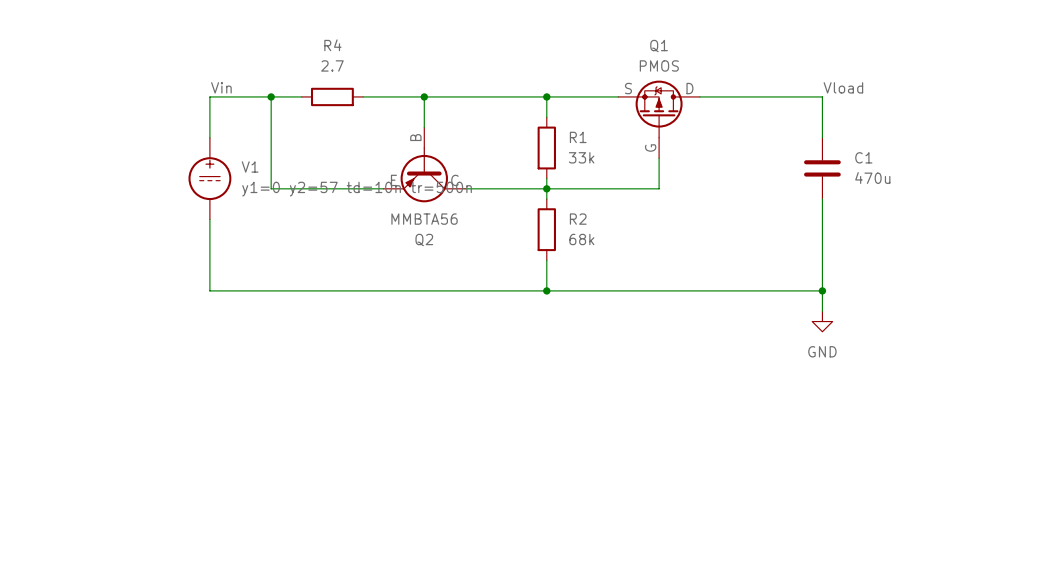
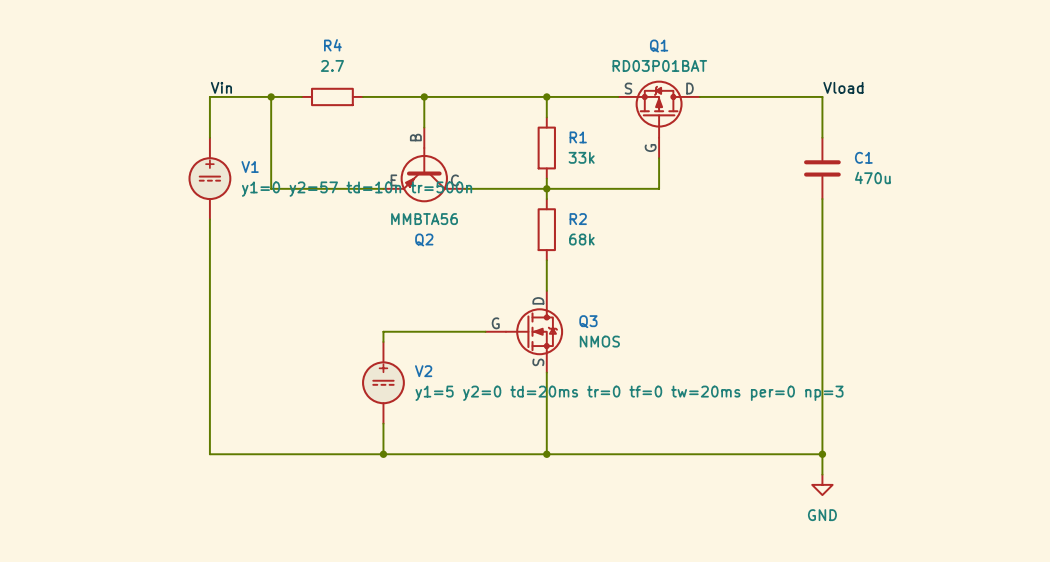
Q1 value: PMOS (659, 65) -> RD03P01BAT (659, 65)
wire: (209, 290) (822, 290) -> (209, 290) (209, 454) (822, 454)
junction: (546, 290) -> none
junction: (822, 290) -> none
wire: none -> (822, 311) (822, 474)
power symbol position: GND (822, 321) -> GND (822, 484)
wire: none -> (485, 331) (383, 331) (383, 341)
Q3: none -> NMOS (524, 331)
wire: none -> (546, 372) (546, 454)
V2: none -> y1=5 y2=0 td=20ms tr=0 tf=0 tw=20ms per=0 np=3 (383, 382)
wire: none -> (383, 423) (383, 454)
junction: none -> (383, 454)
junction: none -> (546, 454)
junction: none -> (822, 454)

